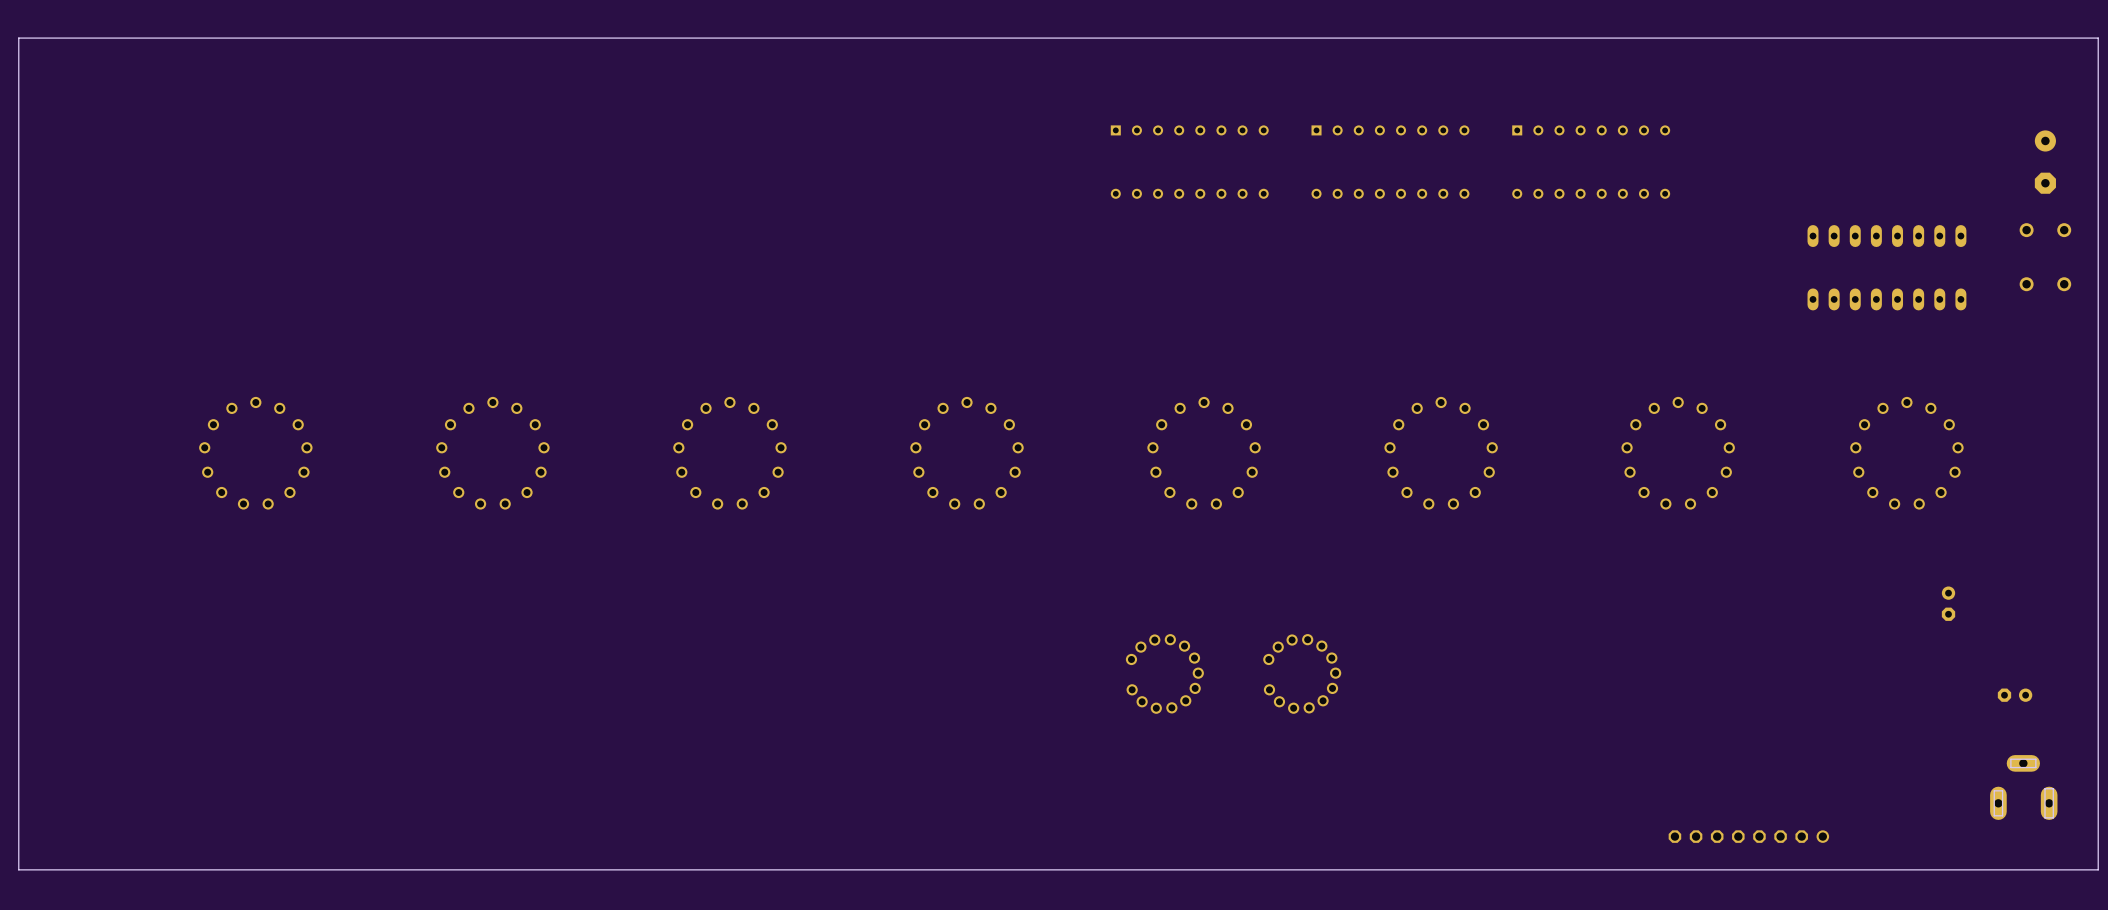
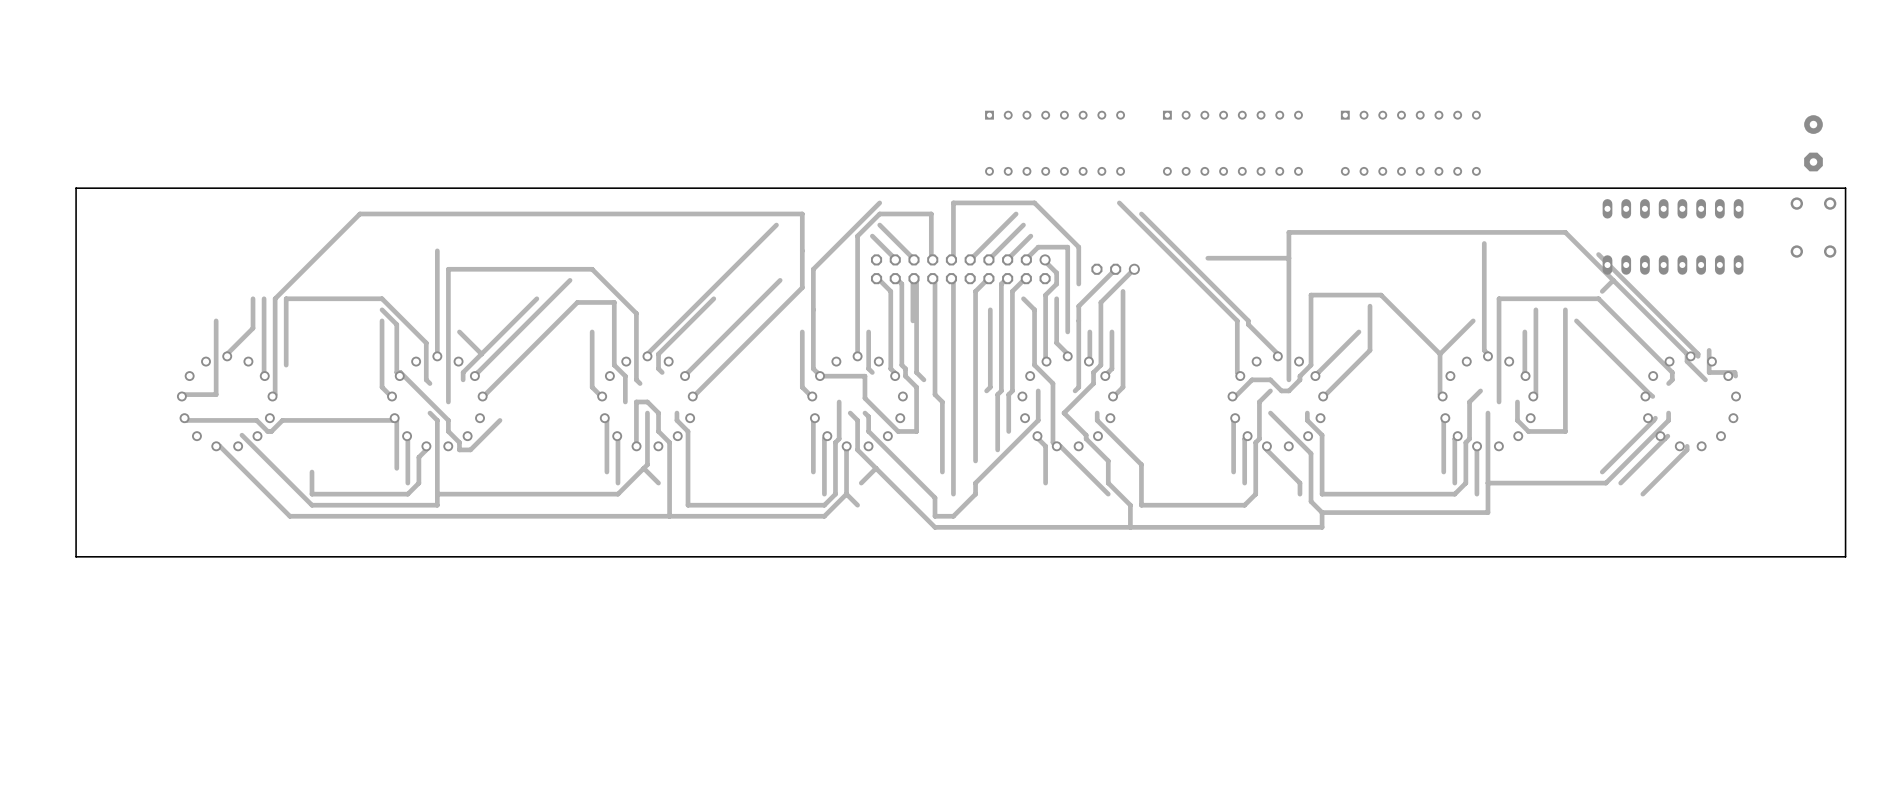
board edge: (2098, 38) (18, 38) (18, 869) (2098, 869) (2098, 38) -> none
board edge: none -> (1845, 188) (76, 188) (76, 556) (1845, 556) (1845, 188)
track: none -> (879, 202) (813, 269) (813, 368) (820, 376) (864, 376) (864, 398) (898, 431) (916, 431) (916, 387) (905, 376) (905, 368) (901, 365) (901, 284) (895, 278)
track: none -> (1119, 202) (1237, 320) (1237, 372) (1240, 376)
track: none -> (1016, 213) (970, 259)
track: none -> (1141, 213) (1248, 320) (1248, 324) (1277, 354) (1277, 356)
track: none -> (776, 225) (647, 354) (647, 356)
track: none -> (879, 225) (914, 259)
track: none -> (1023, 225) (988, 259)
track: none -> (872, 236) (895, 259)
track: none -> (1030, 236) (1007, 259)
track: none -> (1484, 243) (1484, 350) (1487, 356)
track: none -> (437, 250) (437, 356)
track: none -> (1598, 254) (1698, 354) (1698, 356)
track: none -> (1288, 258) (1207, 258)
track: none -> (932, 259) (931, 213) (879, 213) (857, 236) (857, 356)
track: none -> (951, 259) (953, 258) (953, 202) (1034, 202) (1078, 247) (1078, 284)
track: none -> (1026, 259) (1038, 247) (1067, 247) (1067, 331)
track: none -> (1045, 259) (1056, 272) (1056, 284) (1045, 295) (1046, 361)
part: none -> (960, 269)
track: none -> (1115, 269) (1078, 306) (1078, 387) (1075, 390)
part: none -> (1115, 269)
track: none -> (1134, 269) (1100, 302) (1100, 365) (1093, 372) (1093, 383) (1064, 413) (1108, 460) (1108, 483) (1130, 505) (1130, 527)
track: none -> (876, 278) (890, 291) (890, 368) (895, 376)
track: none -> (932, 278) (935, 280) (935, 394) (942, 401) (942, 472)
track: none -> (951, 278) (953, 280) (953, 494)
track: none -> (988, 278) (975, 291) (975, 460)
track: none -> (1007, 278) (1001, 284) (1001, 390) (997, 394) (997, 449)
track: none -> (1026, 278) (1012, 291) (1012, 390) (1008, 394) (1008, 431)
track: none -> (570, 280) (474, 376)
track: none -> (780, 280) (685, 376)
track: none -> (1613, 280) (1602, 291)
track: none -> (1123, 291) (1123, 387) (1113, 396)
track: none -> (253, 298) (253, 328) (227, 354) (227, 356)
track: none -> (264, 298) (264, 376)
track: none -> (536, 298) (463, 372) (463, 379)
track: none -> (713, 298) (658, 354) (658, 368) (662, 372)
track: none -> (1023, 298) (1034, 309) (1034, 365) (1052, 383) (1052, 442) (1056, 446) (1060, 446) (1108, 494)
track: none -> (1056, 298) (1056, 343) (1067, 356)
track: none -> (1370, 306) (1370, 350) (1323, 396)
track: none -> (382, 309) (396, 324) (396, 372) (399, 376) (400, 372) (448, 420) (448, 431) (459, 442) (459, 449) (470, 449) (500, 420)
track: none -> (990, 309) (990, 387) (986, 390)
track: none -> (1535, 309) (1535, 394) (1533, 396)
track: none -> (1565, 309) (1565, 431) (1528, 431) (1517, 420) (1517, 401)
track: none -> (216, 320) (216, 394) (182, 394) (181, 396)
track: none -> (382, 320) (382, 387) (392, 396)
track: none -> (912, 320) (914, 278) (916, 280) (916, 372) (923, 379)
track: none -> (1473, 320) (1440, 354)
track: none -> (1576, 320) (1652, 396)
track: none -> (459, 331) (481, 354)
track: none -> (592, 331) (592, 387) (602, 396)
track: none -> (802, 331) (802, 387) (812, 396)
track: none -> (868, 331) (868, 368) (872, 372)
track: none -> (1089, 331) (1088, 361)
track: none -> (1111, 331) (1111, 368) (1105, 376)
track: none -> (1358, 331) (1315, 376)
track: none -> (1524, 331) (1525, 376)
track: none -> (1709, 350) (1709, 372) (1734, 372) (1735, 376)
track: none -> (1440, 354) (1440, 394) (1442, 396)
track: none -> (1440, 354) (1381, 295) (1311, 295) (1311, 365) (1299, 376) (1299, 379) (1288, 390) (1281, 390) (1270, 379) (1252, 379) (1233, 398) (1232, 396)
track: none -> (286, 365) (286, 298) (382, 298) (426, 343) (426, 379) (429, 383)
track: none -> (1705, 379) (1687, 361) (1687, 354) (1565, 232) (1288, 232) (1288, 379)
track: none -> (640, 383) (636, 379) (636, 313) (592, 269) (448, 269) (448, 401)
track: none -> (1668, 383) (1672, 379) (1672, 372) (1598, 298) (1499, 298) (1499, 401)
track: none -> (1038, 390) (1038, 420) (975, 483) (975, 494) (953, 516) (935, 516) (935, 497) (868, 431) (868, 416) (864, 413)
track: none -> (1270, 390) (1259, 401) (1259, 438) (1255, 442) (1255, 494) (1244, 505) (1141, 505) (1141, 464) (1097, 420) (1097, 413)
track: none -> (1480, 390) (1469, 401) (1469, 438) (1465, 442) (1465, 483) (1454, 494) (1322, 494) (1322, 435) (1307, 420) (1307, 413)
track: none -> (482, 396) (577, 302) (614, 302) (614, 365) (625, 376) (625, 401)
track: none -> (692, 396) (802, 287) (802, 213) (359, 213) (275, 298) (275, 394) (272, 396)
track: none -> (839, 401) (839, 438) (835, 442) (835, 494) (824, 505) (688, 505) (688, 431) (676, 420) (676, 413)
track: none -> (429, 413) (437, 420) (437, 505) (312, 505) (241, 435)
track: none -> (647, 413) (647, 464) (617, 494) (437, 494)
track: none -> (850, 413) (857, 420) (857, 449) (935, 527) (1322, 527) (1322, 512)
track: none -> (1270, 413) (1311, 453) (1311, 501) (1322, 512)
track: none -> (1487, 413) (1487, 512) (1322, 512)
track: none -> (1668, 413) (1668, 420) (1605, 483) (1487, 483)
track: none -> (184, 418) (186, 420) (256, 420) (267, 431) (271, 431) (282, 420) (393, 420) (394, 418) (396, 420) (396, 468)
track: none -> (604, 418) (606, 420) (606, 472)
track: none -> (814, 418) (813, 472)
track: none -> (1235, 418) (1233, 472)
track: none -> (1445, 418) (1443, 472)
track: none -> (1655, 418) (1602, 472)
track: none -> (407, 436) (407, 483)
track: none -> (617, 436) (617, 483)
track: none -> (827, 436) (824, 438) (824, 494)
track: none -> (1037, 436) (1045, 446) (1045, 483)
track: none -> (1247, 436) (1244, 438) (1244, 483)
track: none -> (1457, 436) (1454, 438) (1454, 483)
track: none -> (1667, 436) (1620, 483)
track: none -> (216, 446) (219, 446) (289, 516) (824, 516) (846, 494)
track: none -> (426, 446) (426, 449) (418, 457) (418, 483) (407, 494) (312, 494) (312, 472)
track: none -> (636, 446) (636, 401) (647, 401) (658, 413) (658, 431) (669, 442) (669, 516)
track: none -> (846, 446) (846, 494)
track: none -> (1266, 446) (1266, 449) (1299, 483) (1299, 494)
track: none -> (1477, 446) (1476, 494)
track: none -> (1687, 446) (1687, 449) (1642, 494)
track: none -> (643, 468) (658, 483)
track: none -> (876, 468) (861, 483)
track: none -> (846, 494) (857, 505)
part: (1948, 603) -> none
part: (1164, 673) -> none
part: (1302, 673) -> none
part: (2015, 695) -> none
part: (2023, 787) -> none
part: (1748, 836) -> none

